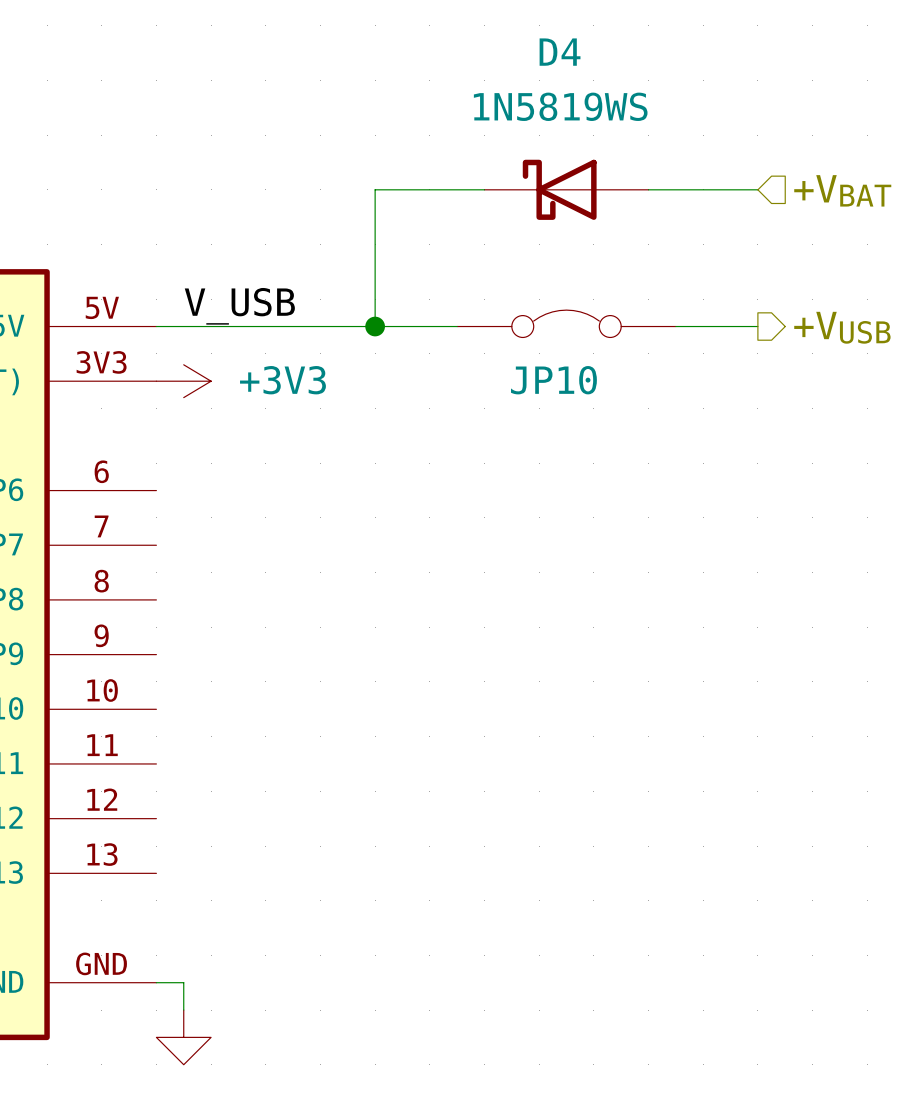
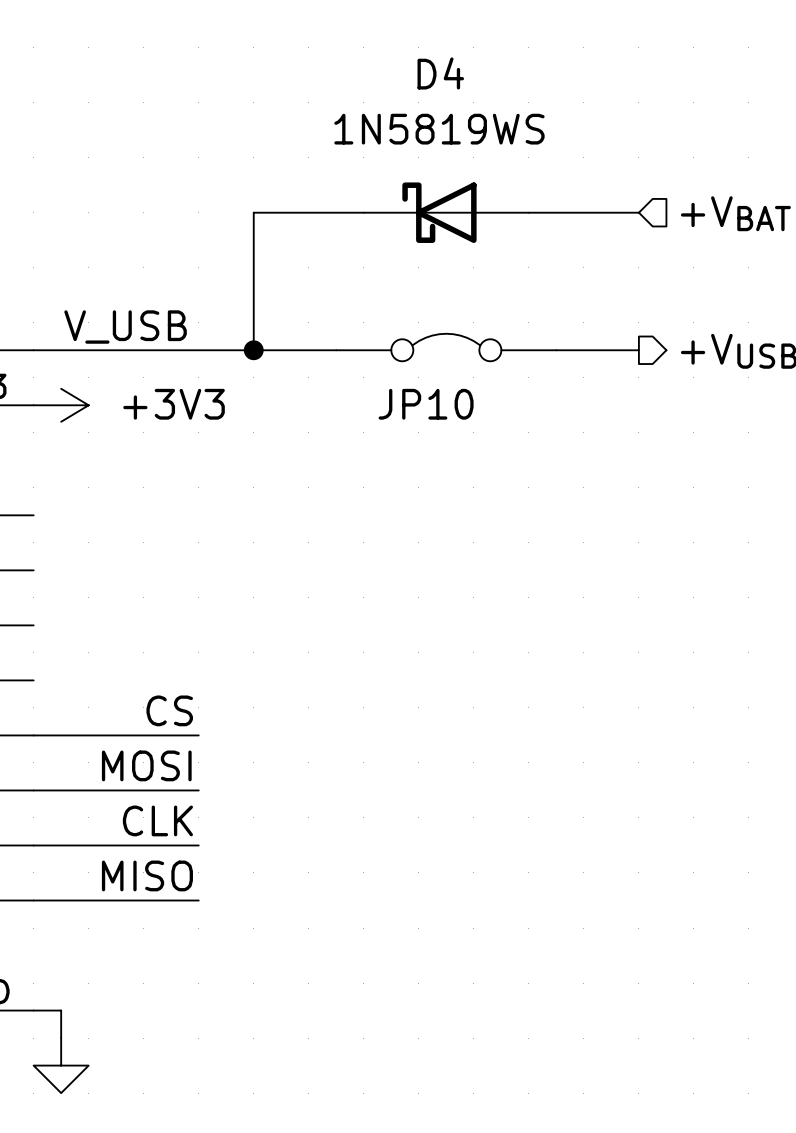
label: none -> CS (169, 710)
wire: none -> (33, 735) (198, 735)
label: none -> MOSI (146, 765)
wire: none -> (33, 790) (198, 790)
label: none -> CLK (157, 820)
wire: none -> (33, 845) (198, 845)
label: none -> MISO (147, 875)
wire: none -> (33, 900) (198, 900)

